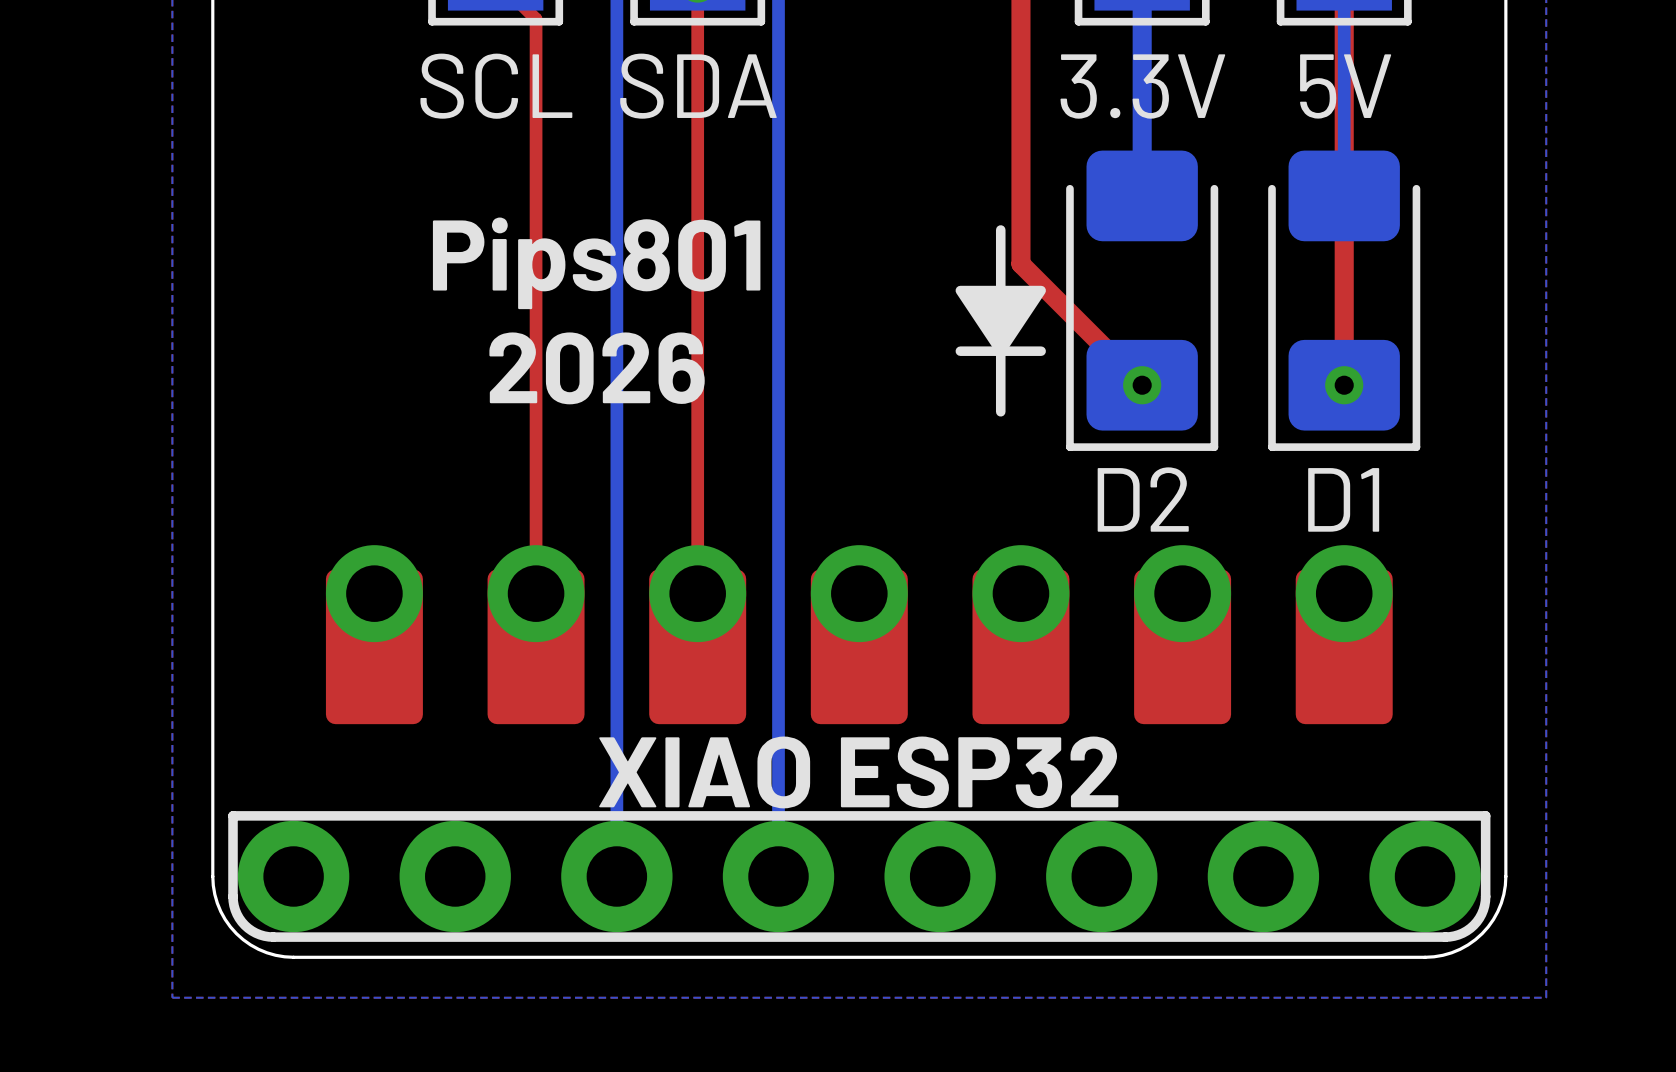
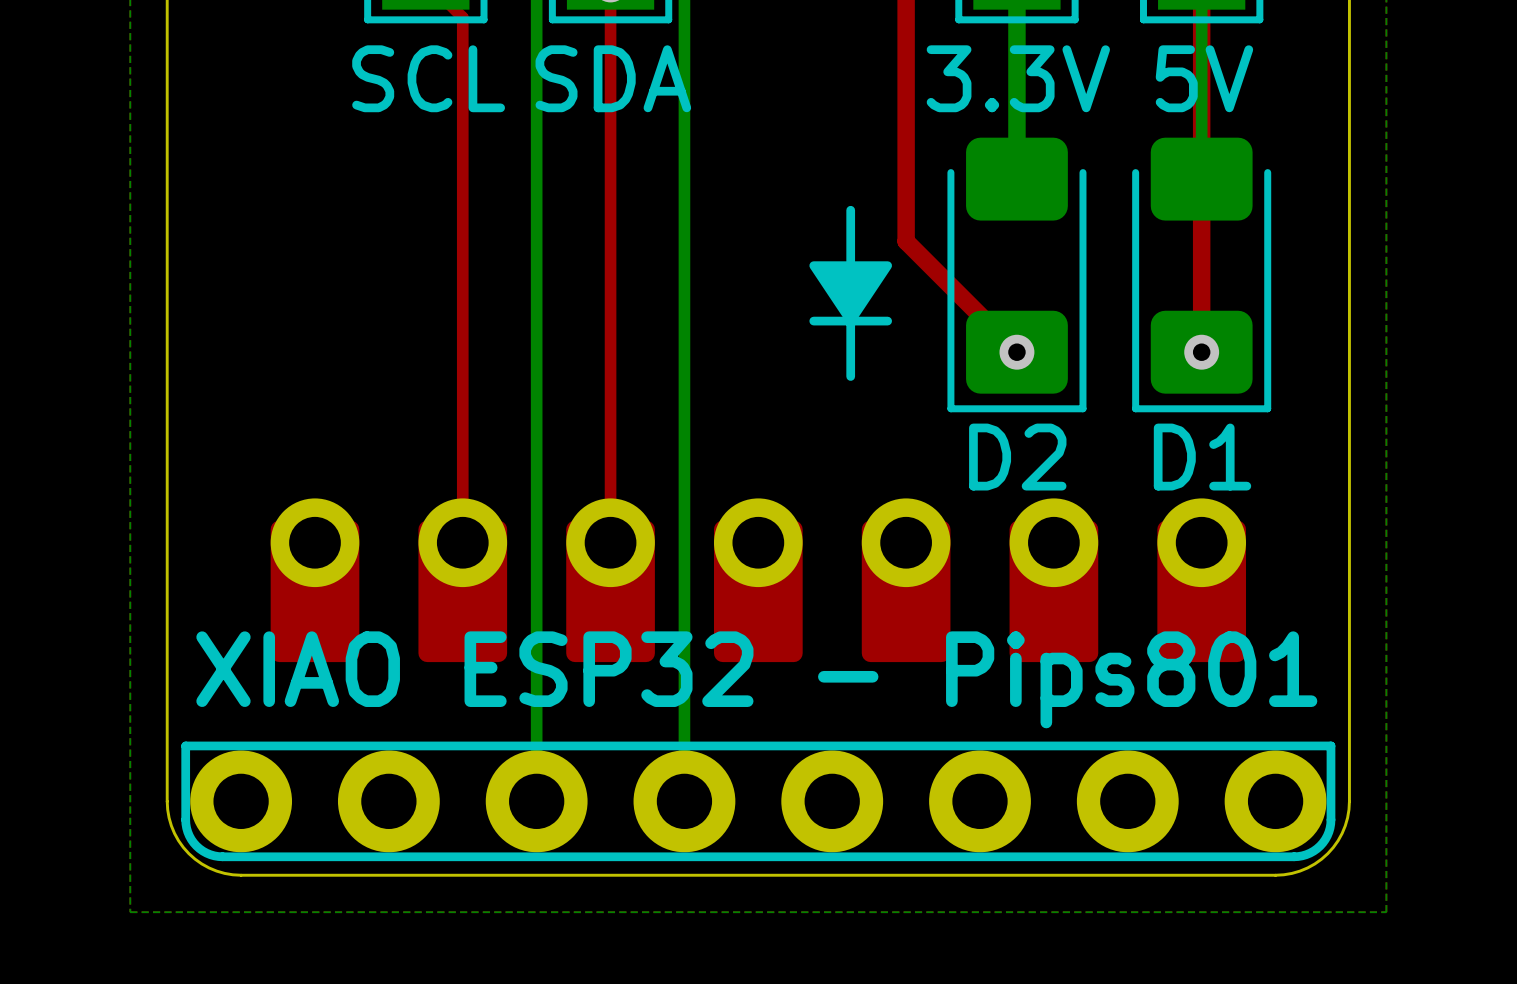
line: (1000, 229) (1000, 411) -> (850, 210) (850, 376)
text: Pips801 (596, 263) -> none
drawing position: (1000, 320) -> (850, 293)
line: (1041, 351) (1000, 351) -> (850, 321) (813, 321)
text: 2026 (597, 368) -> none
text: XIAO ESP32 (858, 772) -> XIAO ESP32 - Pips801 (756, 679)

